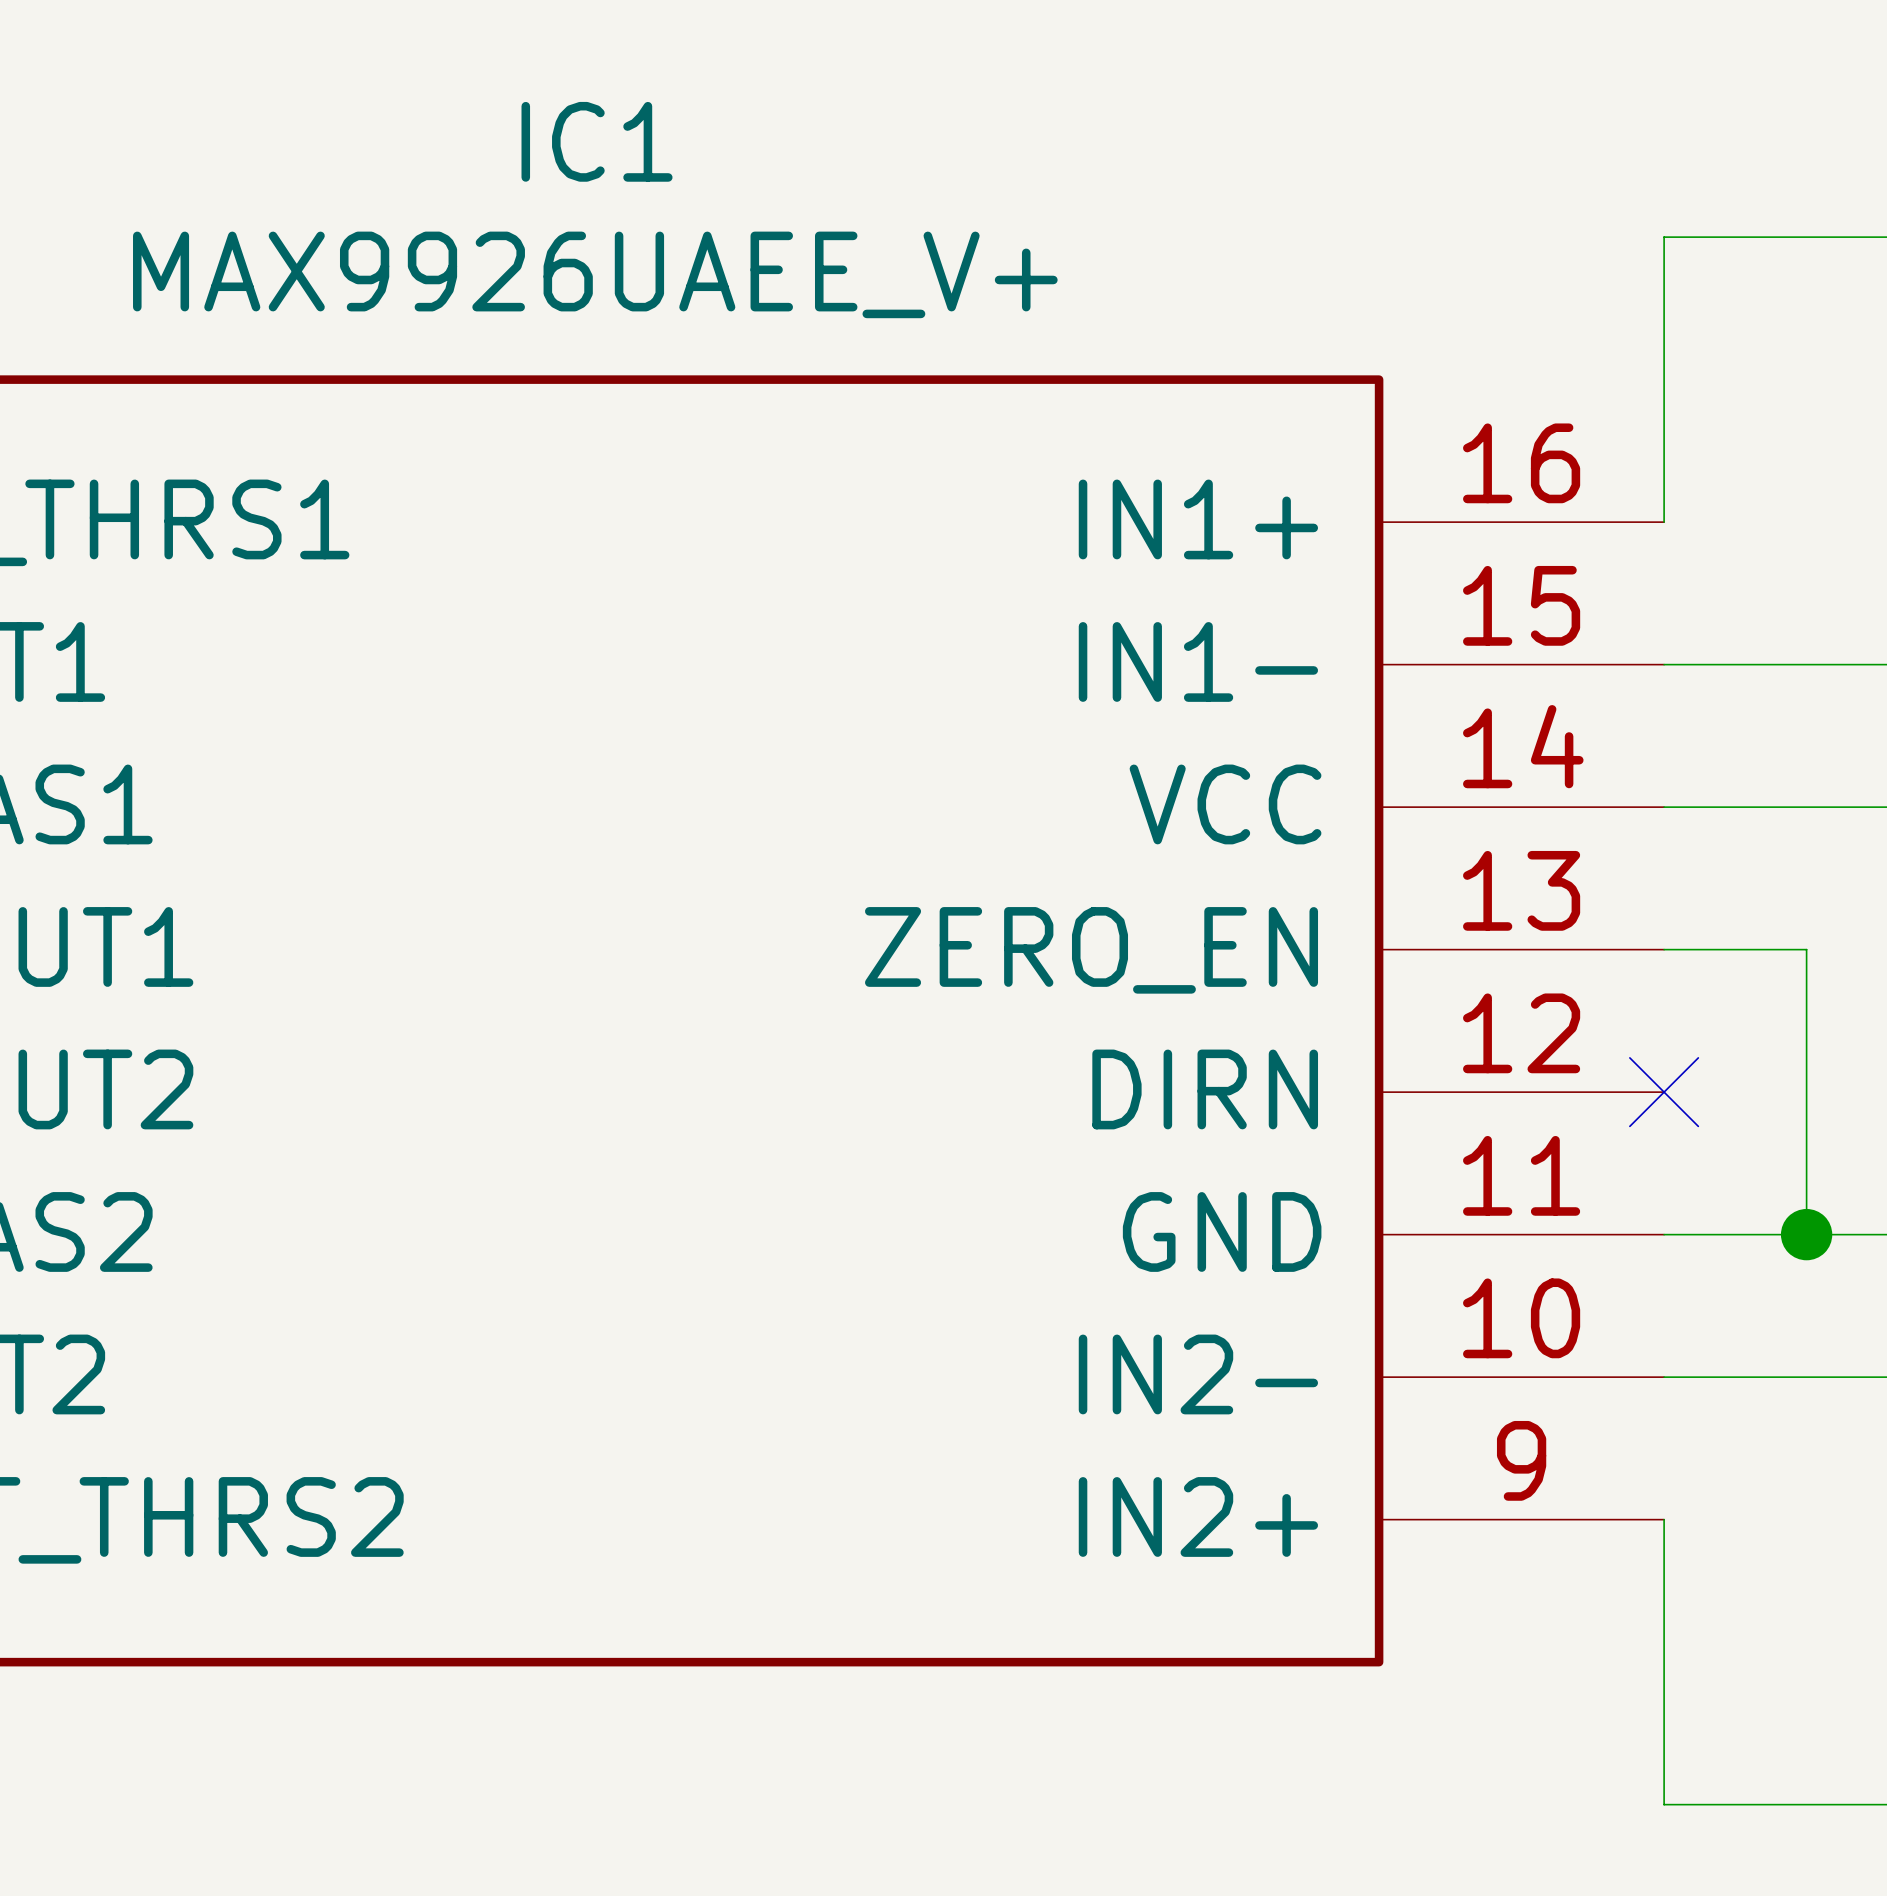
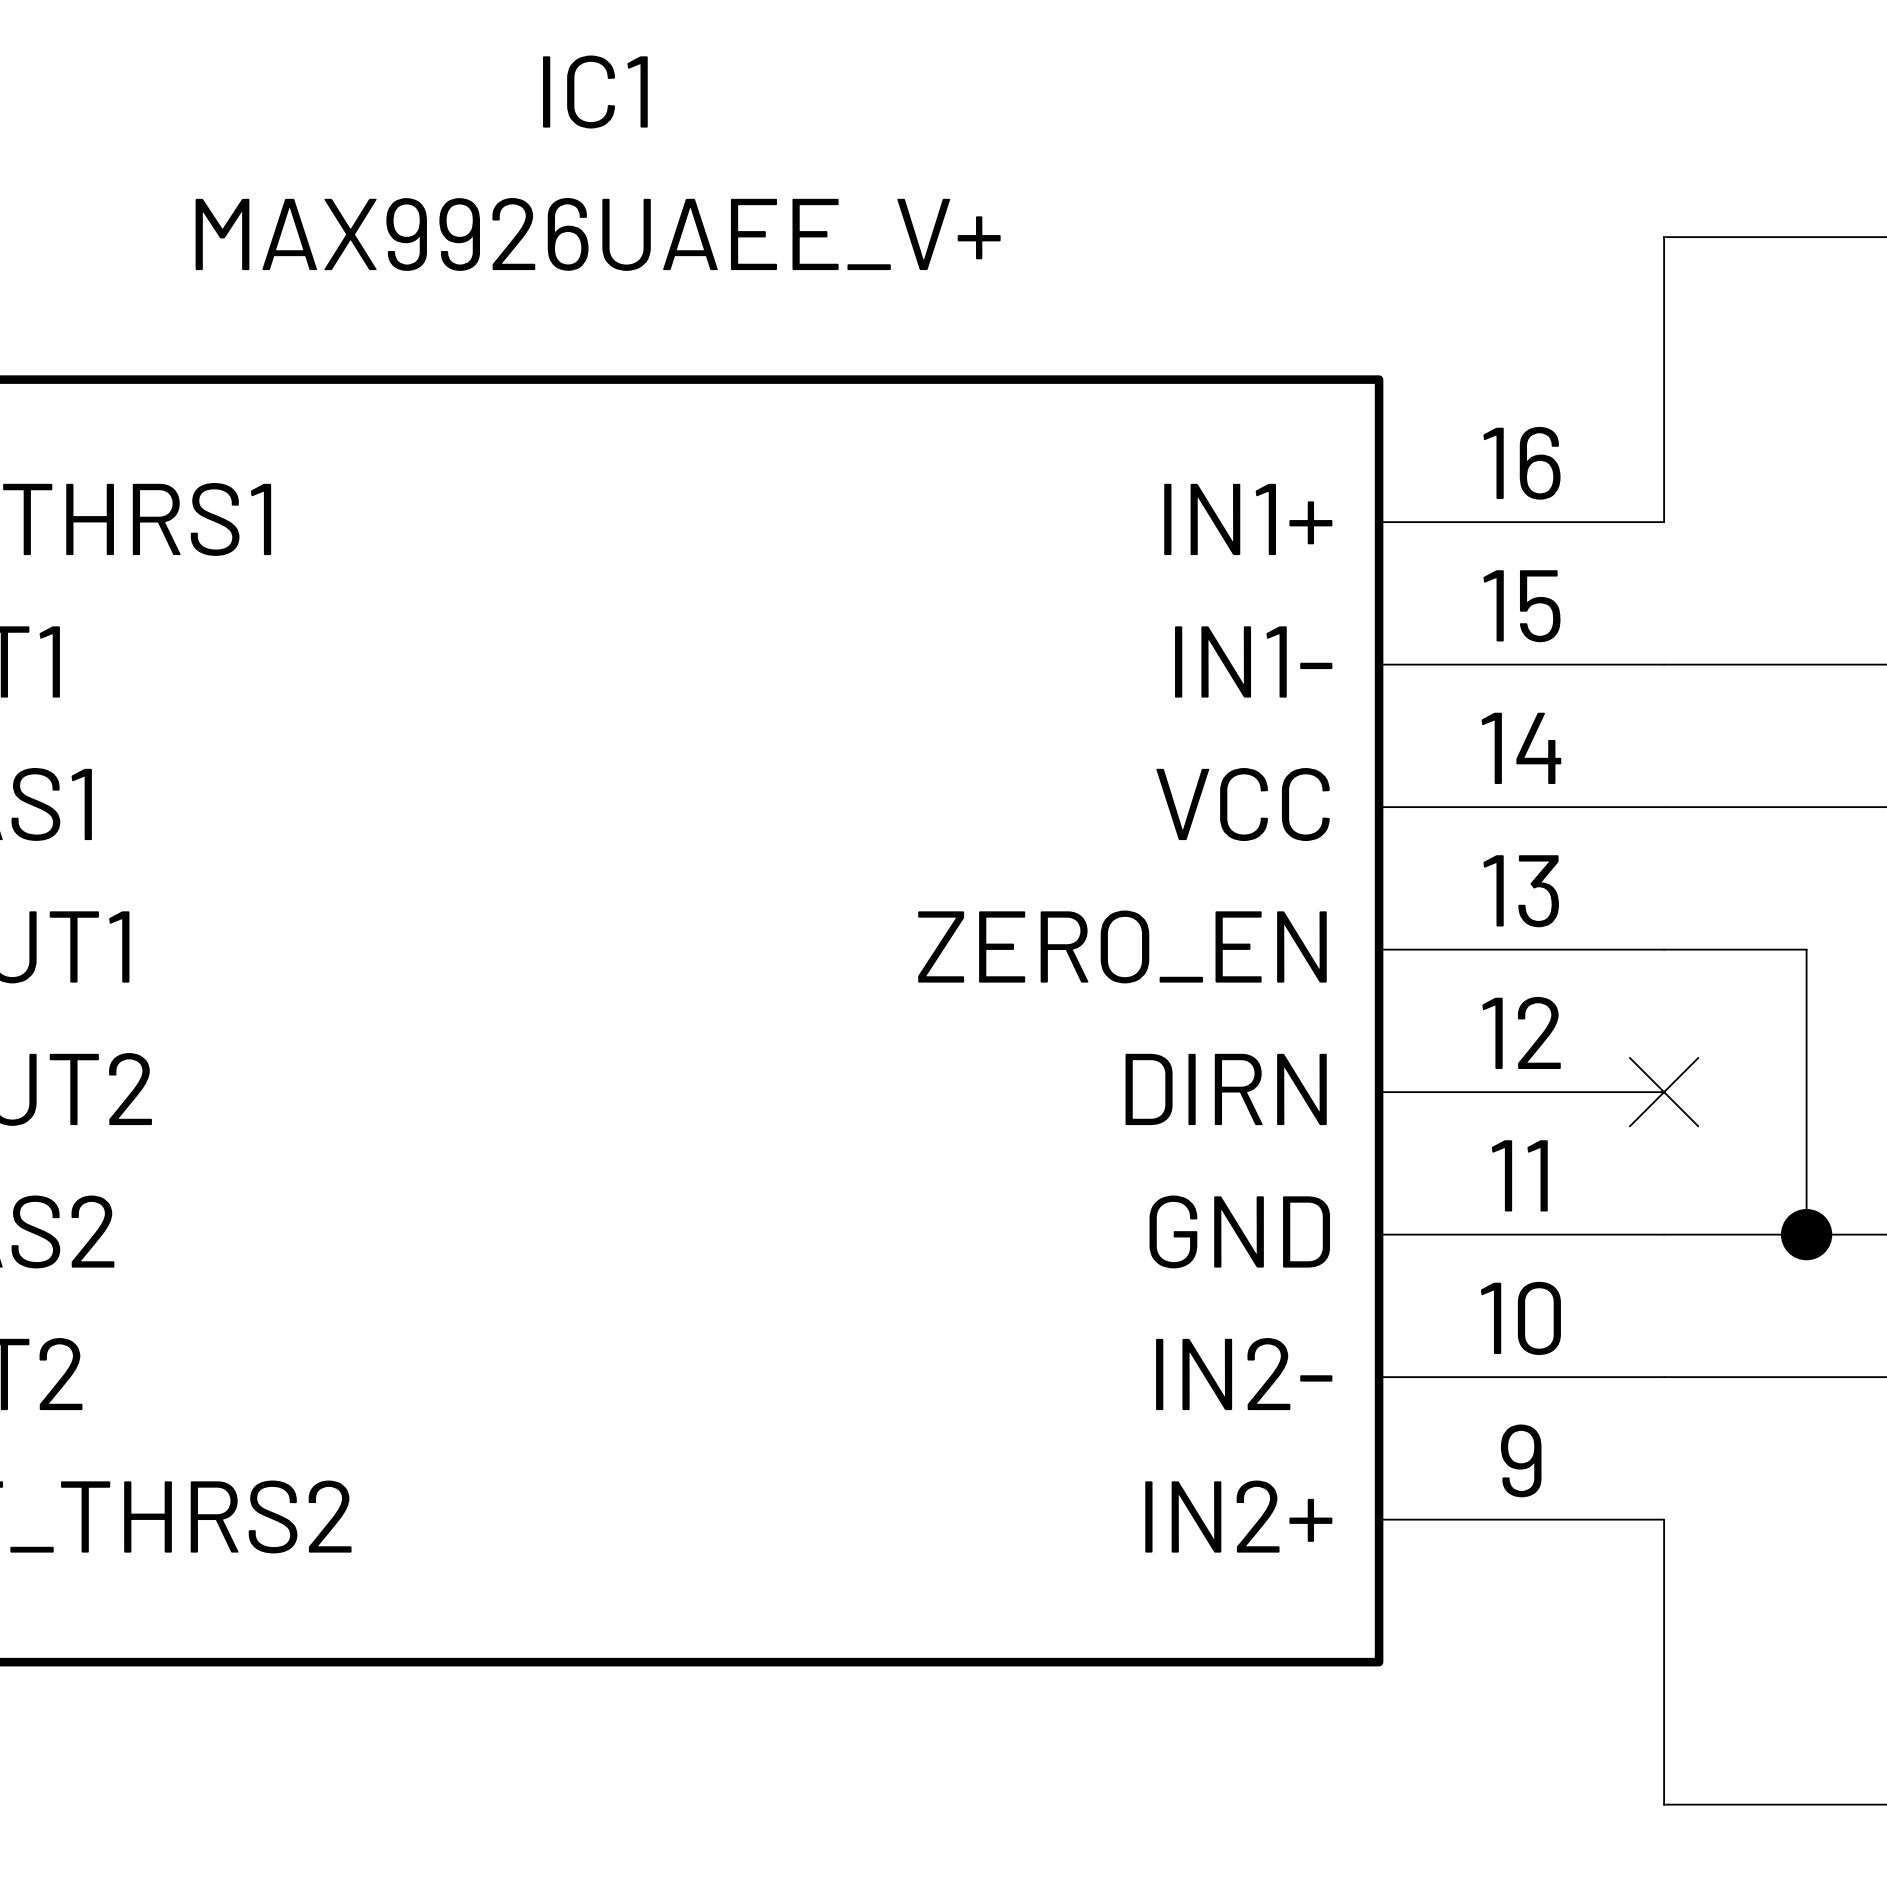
IC1 name position: IC1 (597, 141) -> IC1 (595, 92)
IC1 value position: MAX9926UAEE_V+ (595, 274) -> MAX9926UAEE_V+ (598, 234)

